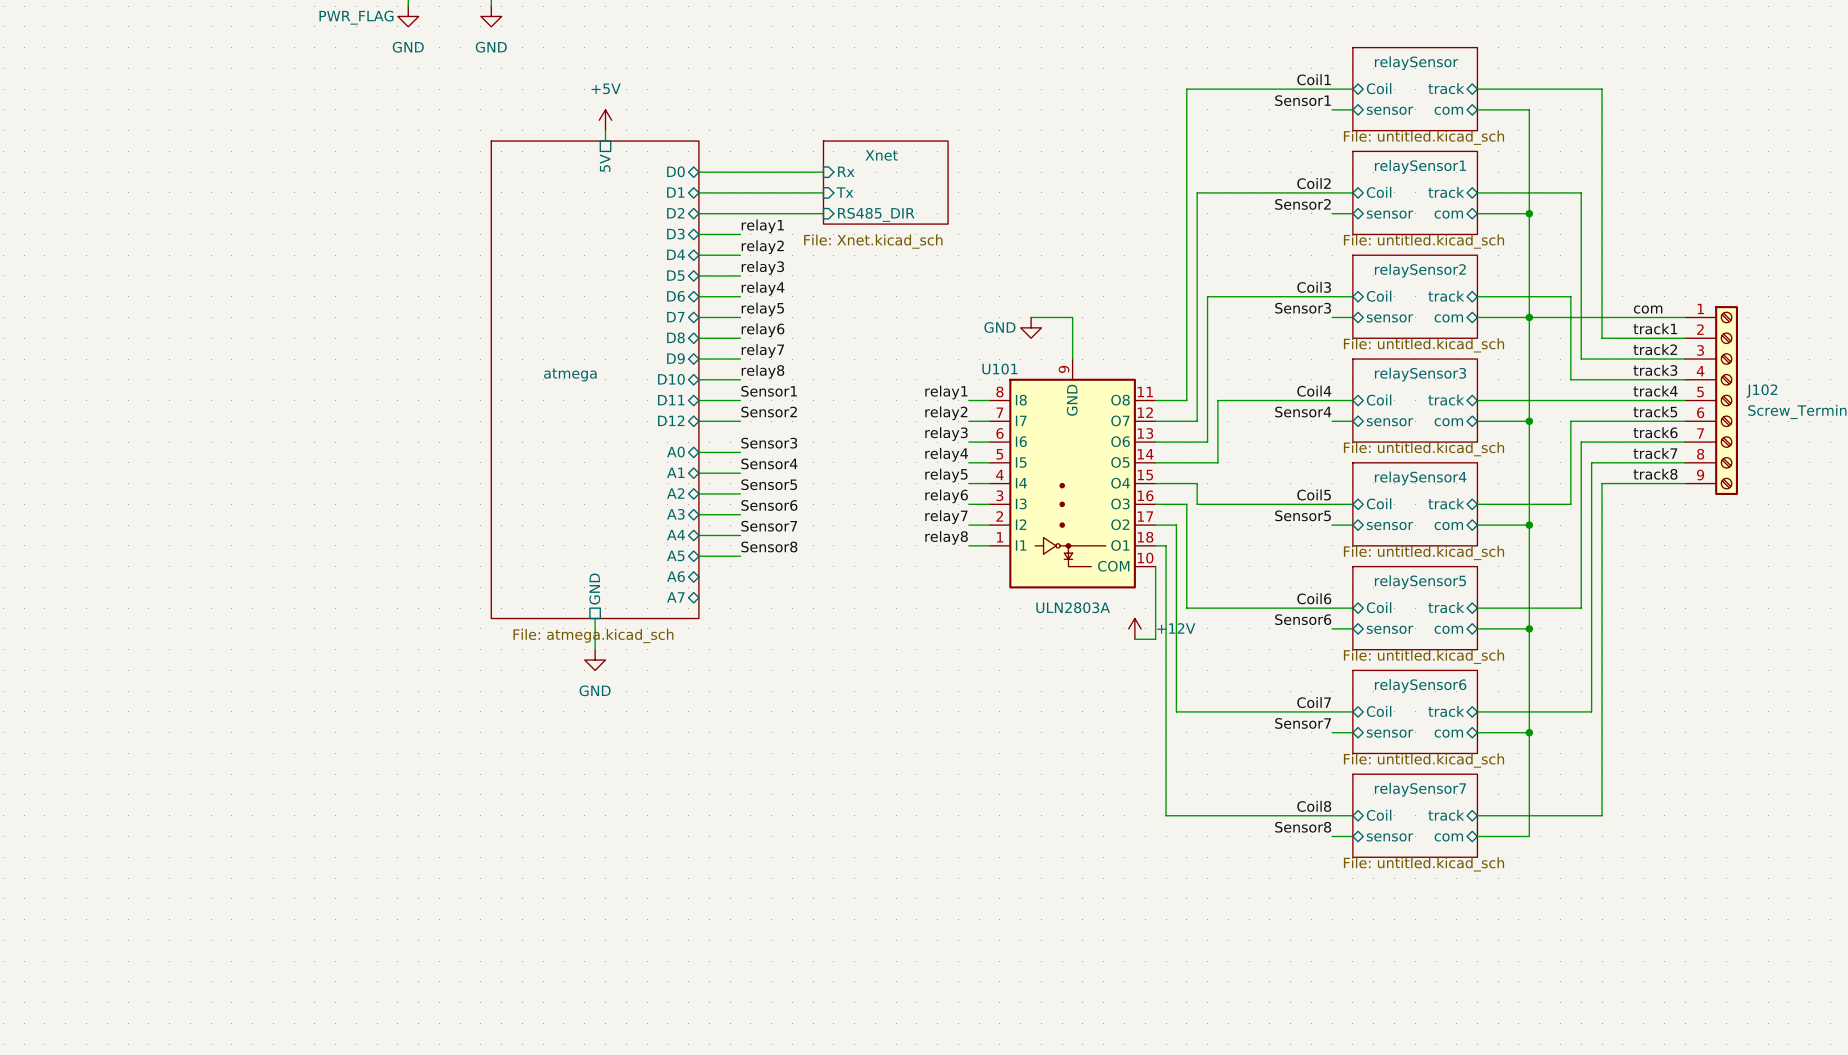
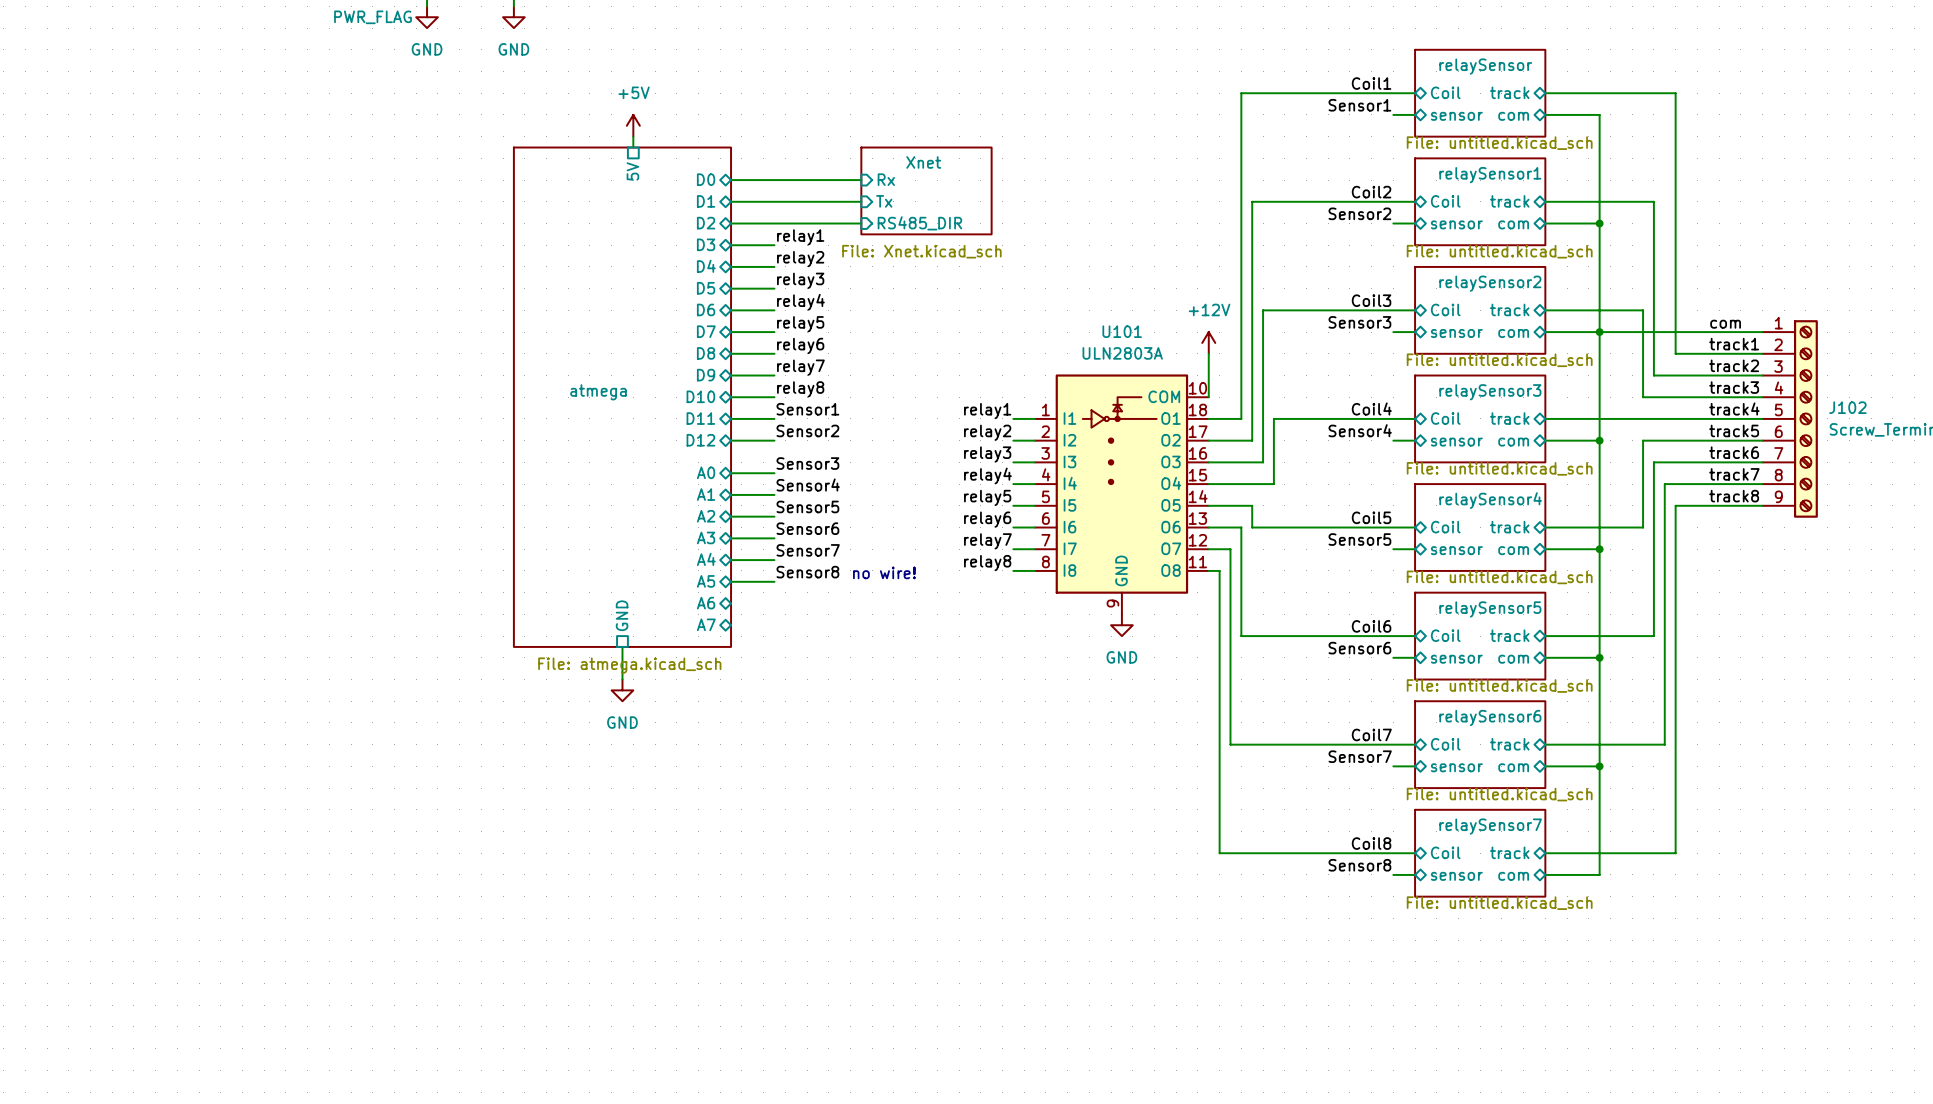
wire: (1031, 317) (1072, 317) (1072, 359) -> none
power symbol: GND (1031, 327) -> none
power symbol: none -> +12V (1208, 342)
wire: none -> (1208, 353) (1208, 397)
U101 name position: U101 (999, 369) -> U101 (1122, 331)
U101 flip: as is (1072, 483) -> up-down (1121, 484)
text: none -> no wire! (884, 572)
wire: (1155, 566) (1155, 639) (1134, 639) -> none
power symbol: none -> GND (1121, 625)
power symbol: +12V (1134, 628) -> none

